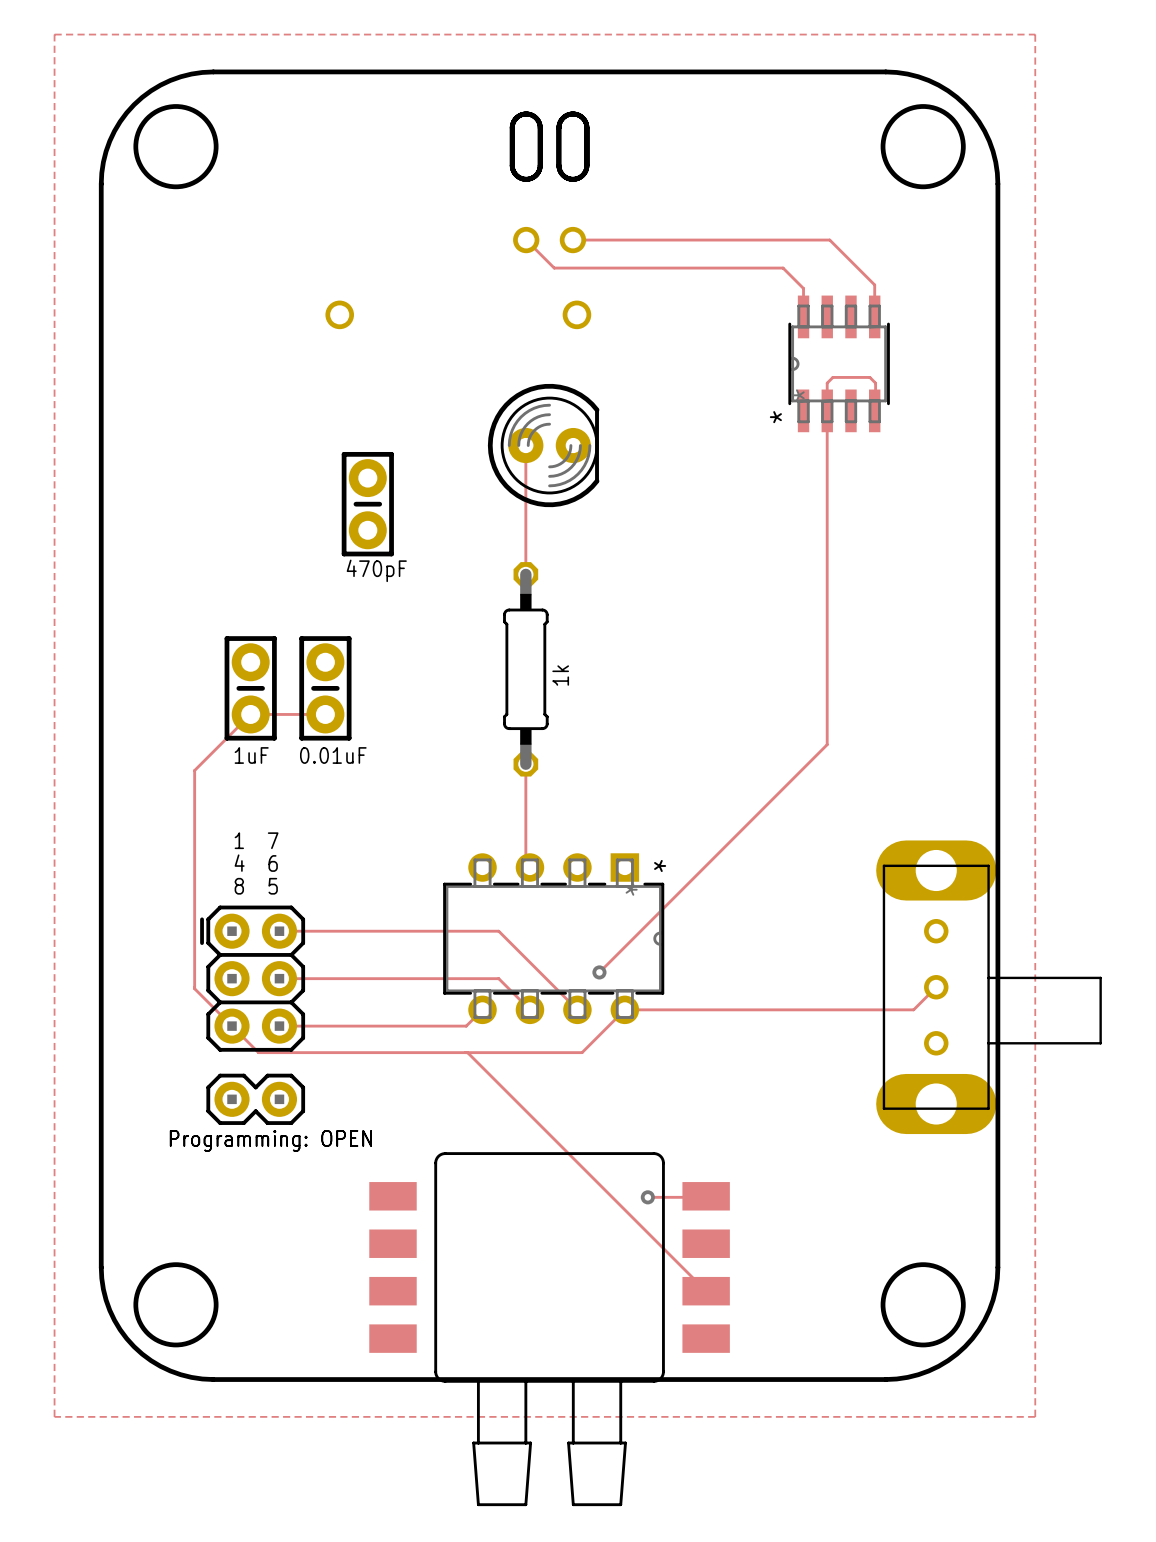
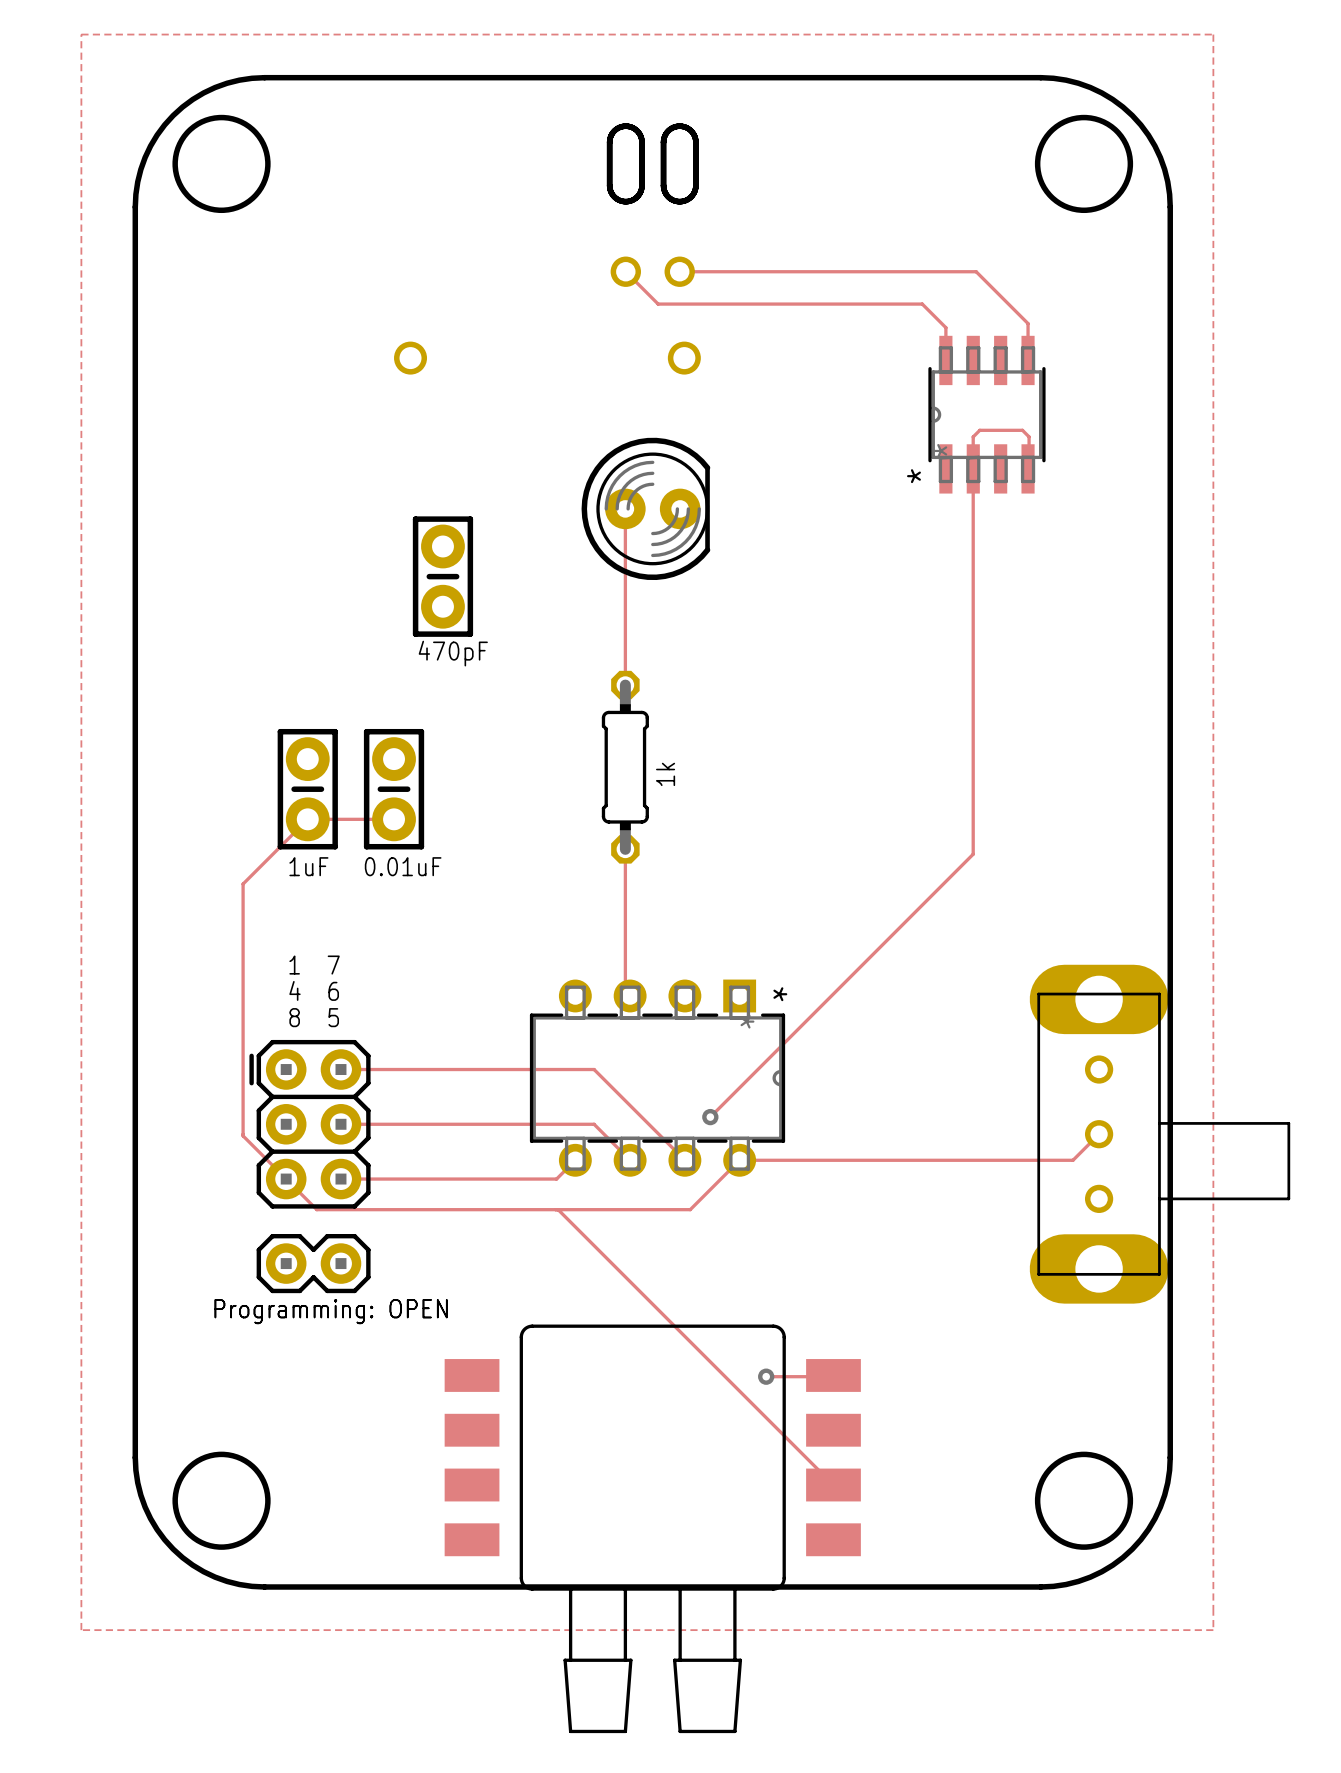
part footprint: [503, 562, 549, 777] -> [601, 670, 649, 864]
track: none -> (625, 657) (625, 685)
track: none -> (625, 849) (625, 876)

